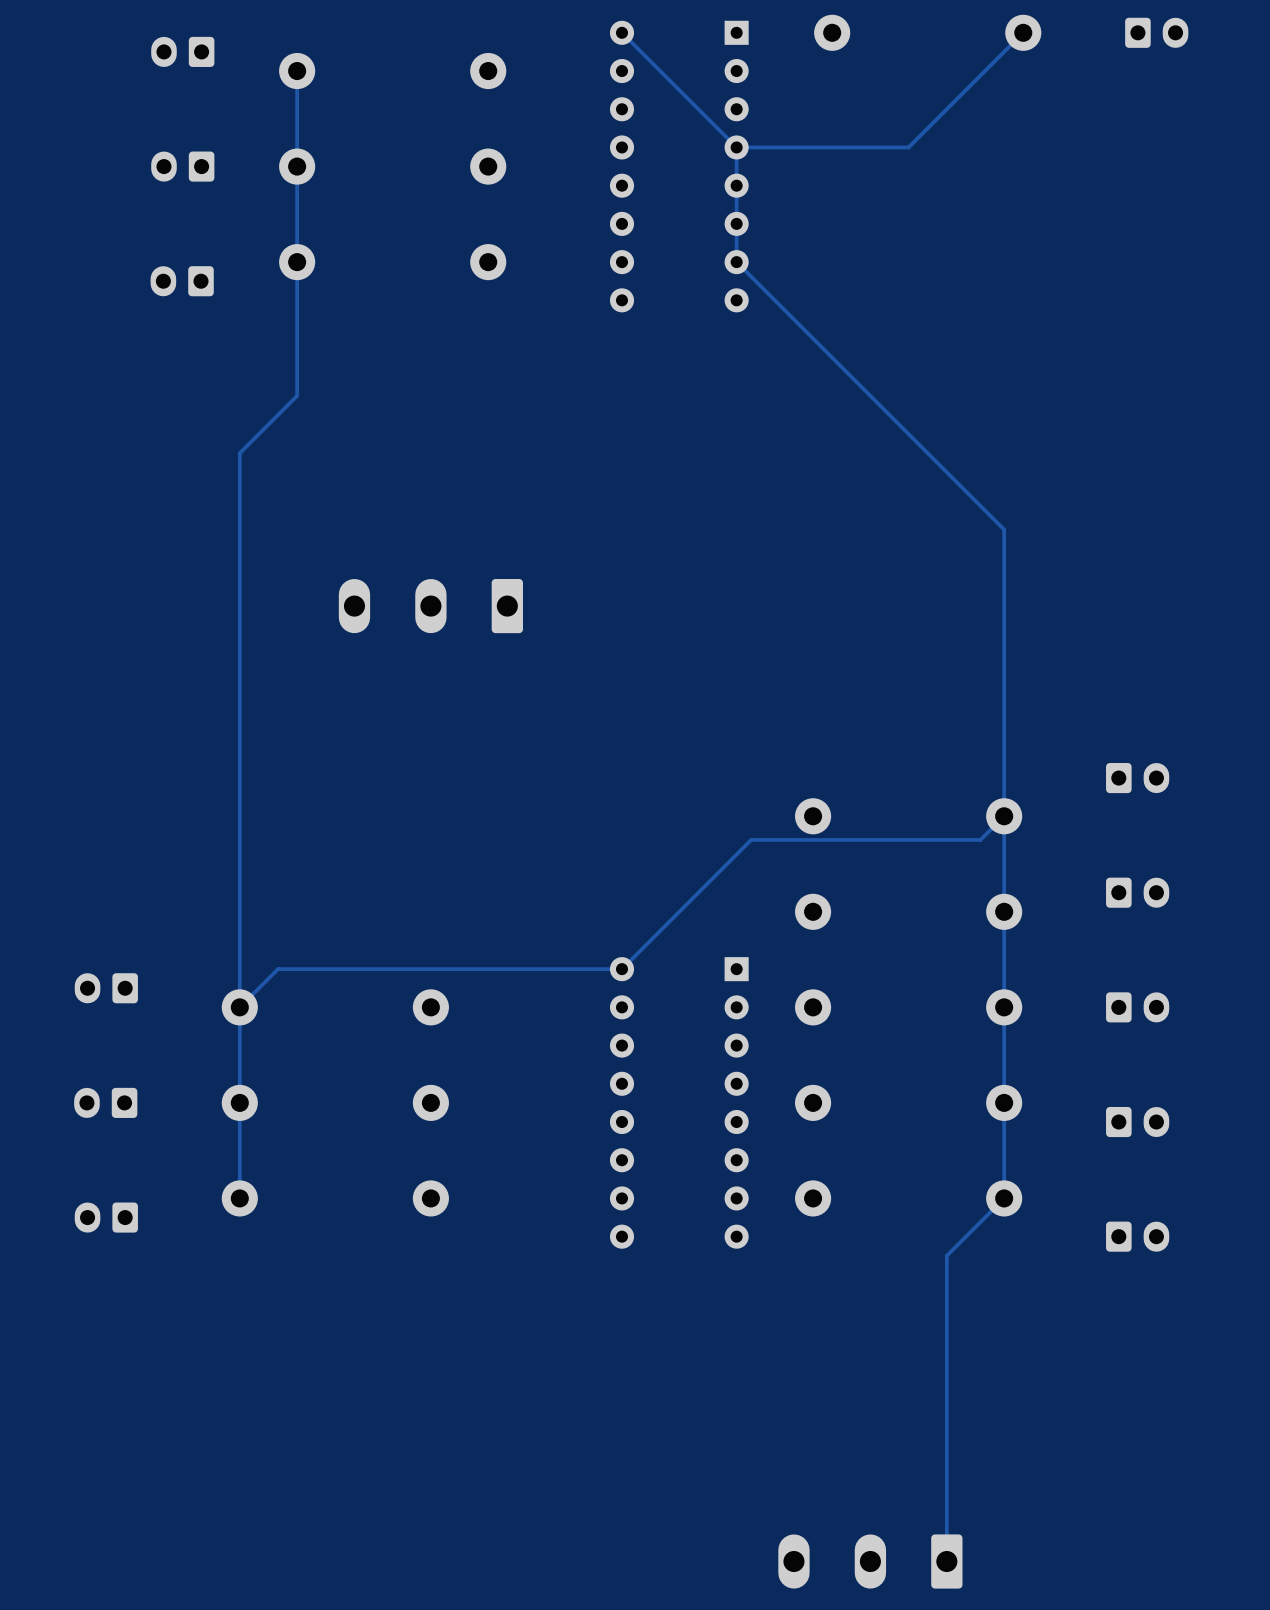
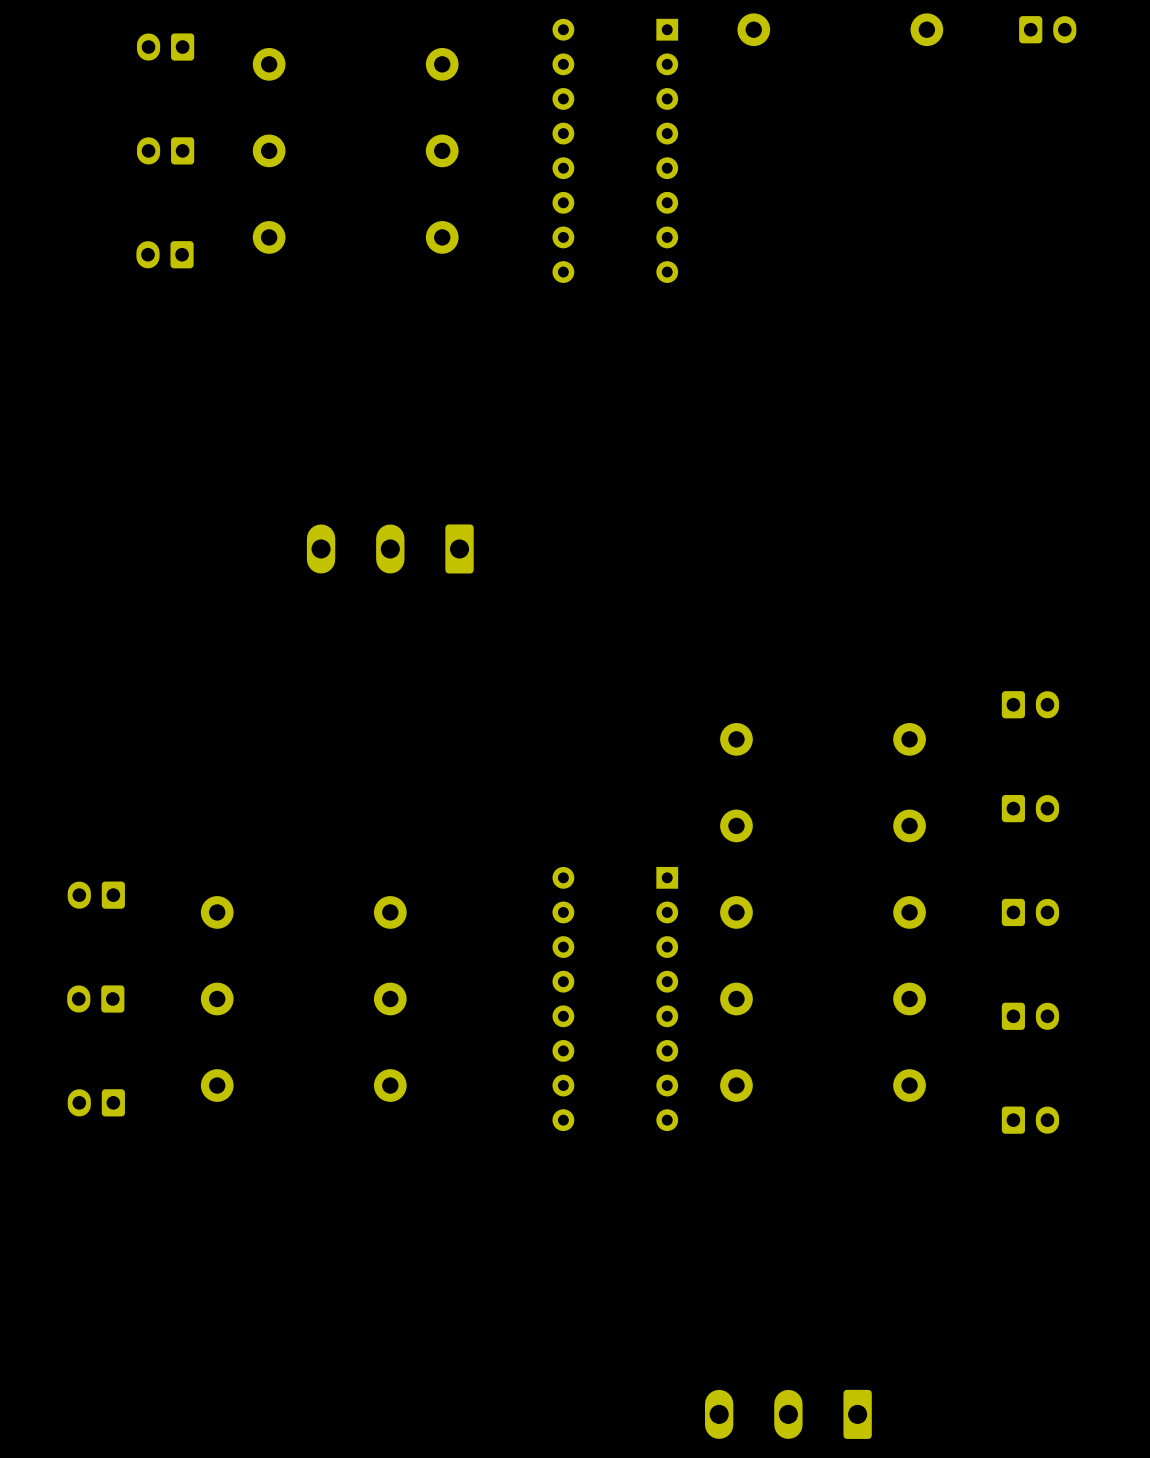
track: (621, 32) (736, 147) -> none
track: (1023, 32) (908, 147) (736, 147) -> none
track: (297, 71) (297, 395) (239, 453) (239, 1198) -> none
track: (736, 147) (736, 262) (1004, 529) (1004, 1198) (946, 1255) (946, 1561) -> none
track: (1004, 816) (980, 839) (751, 839) (621, 969) (278, 969) (239, 1007) -> none

